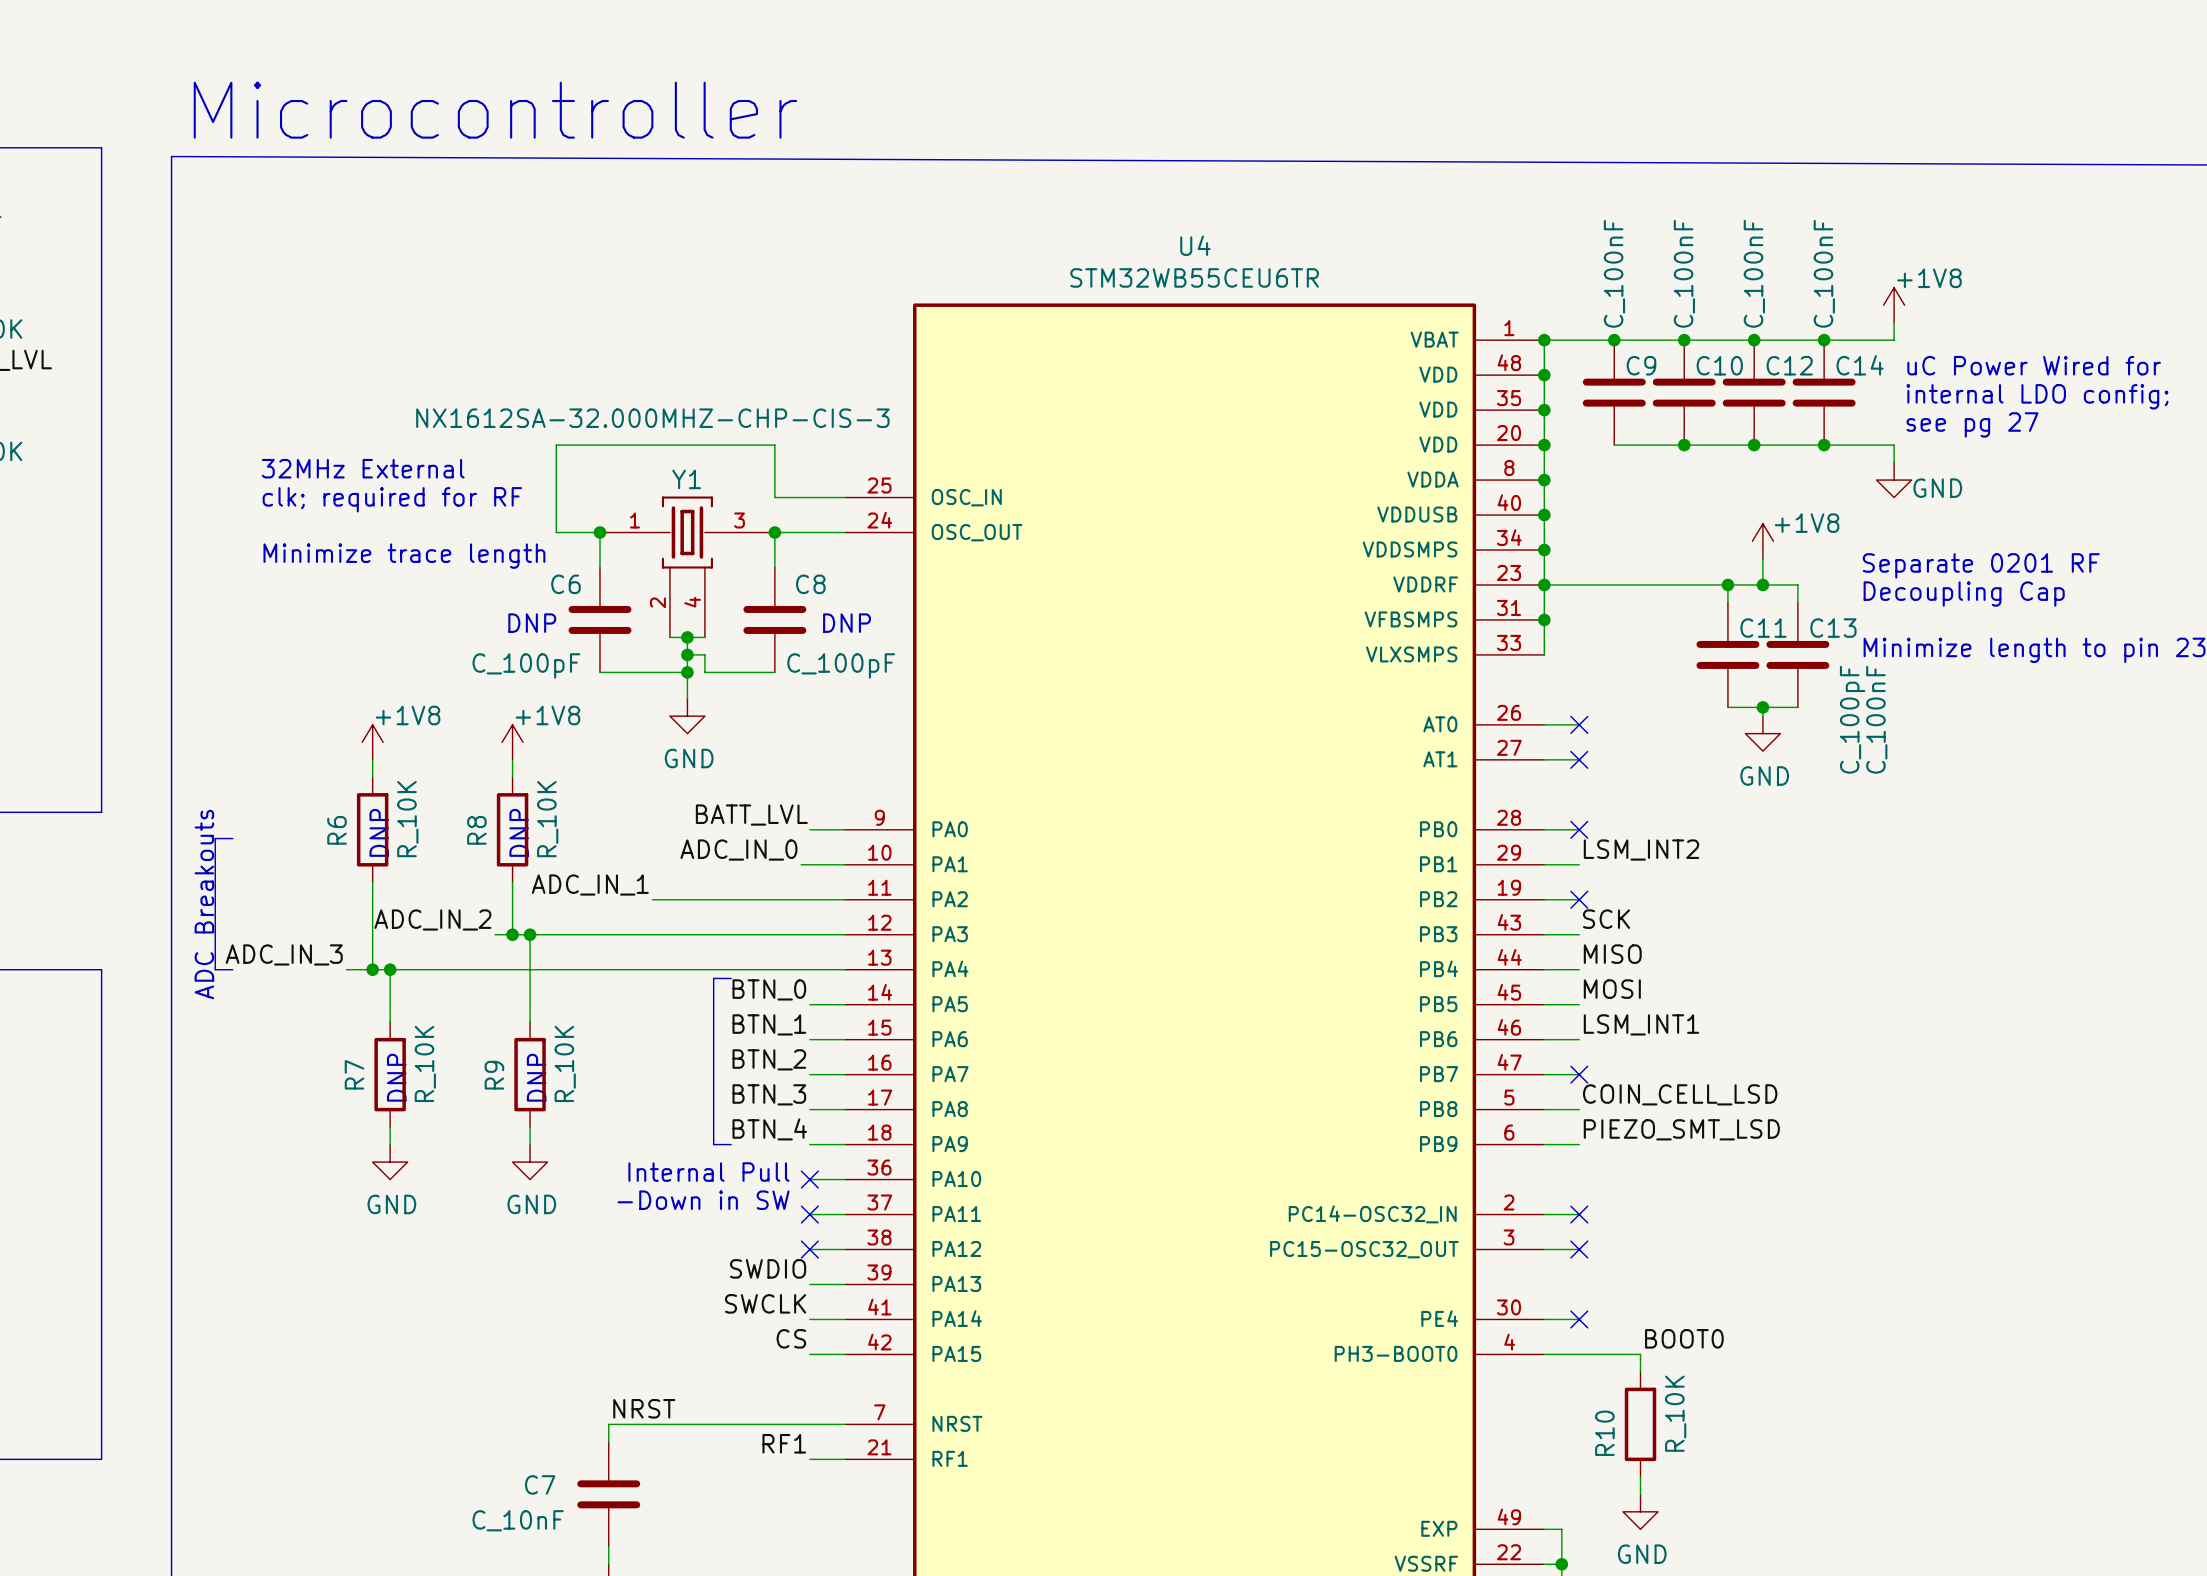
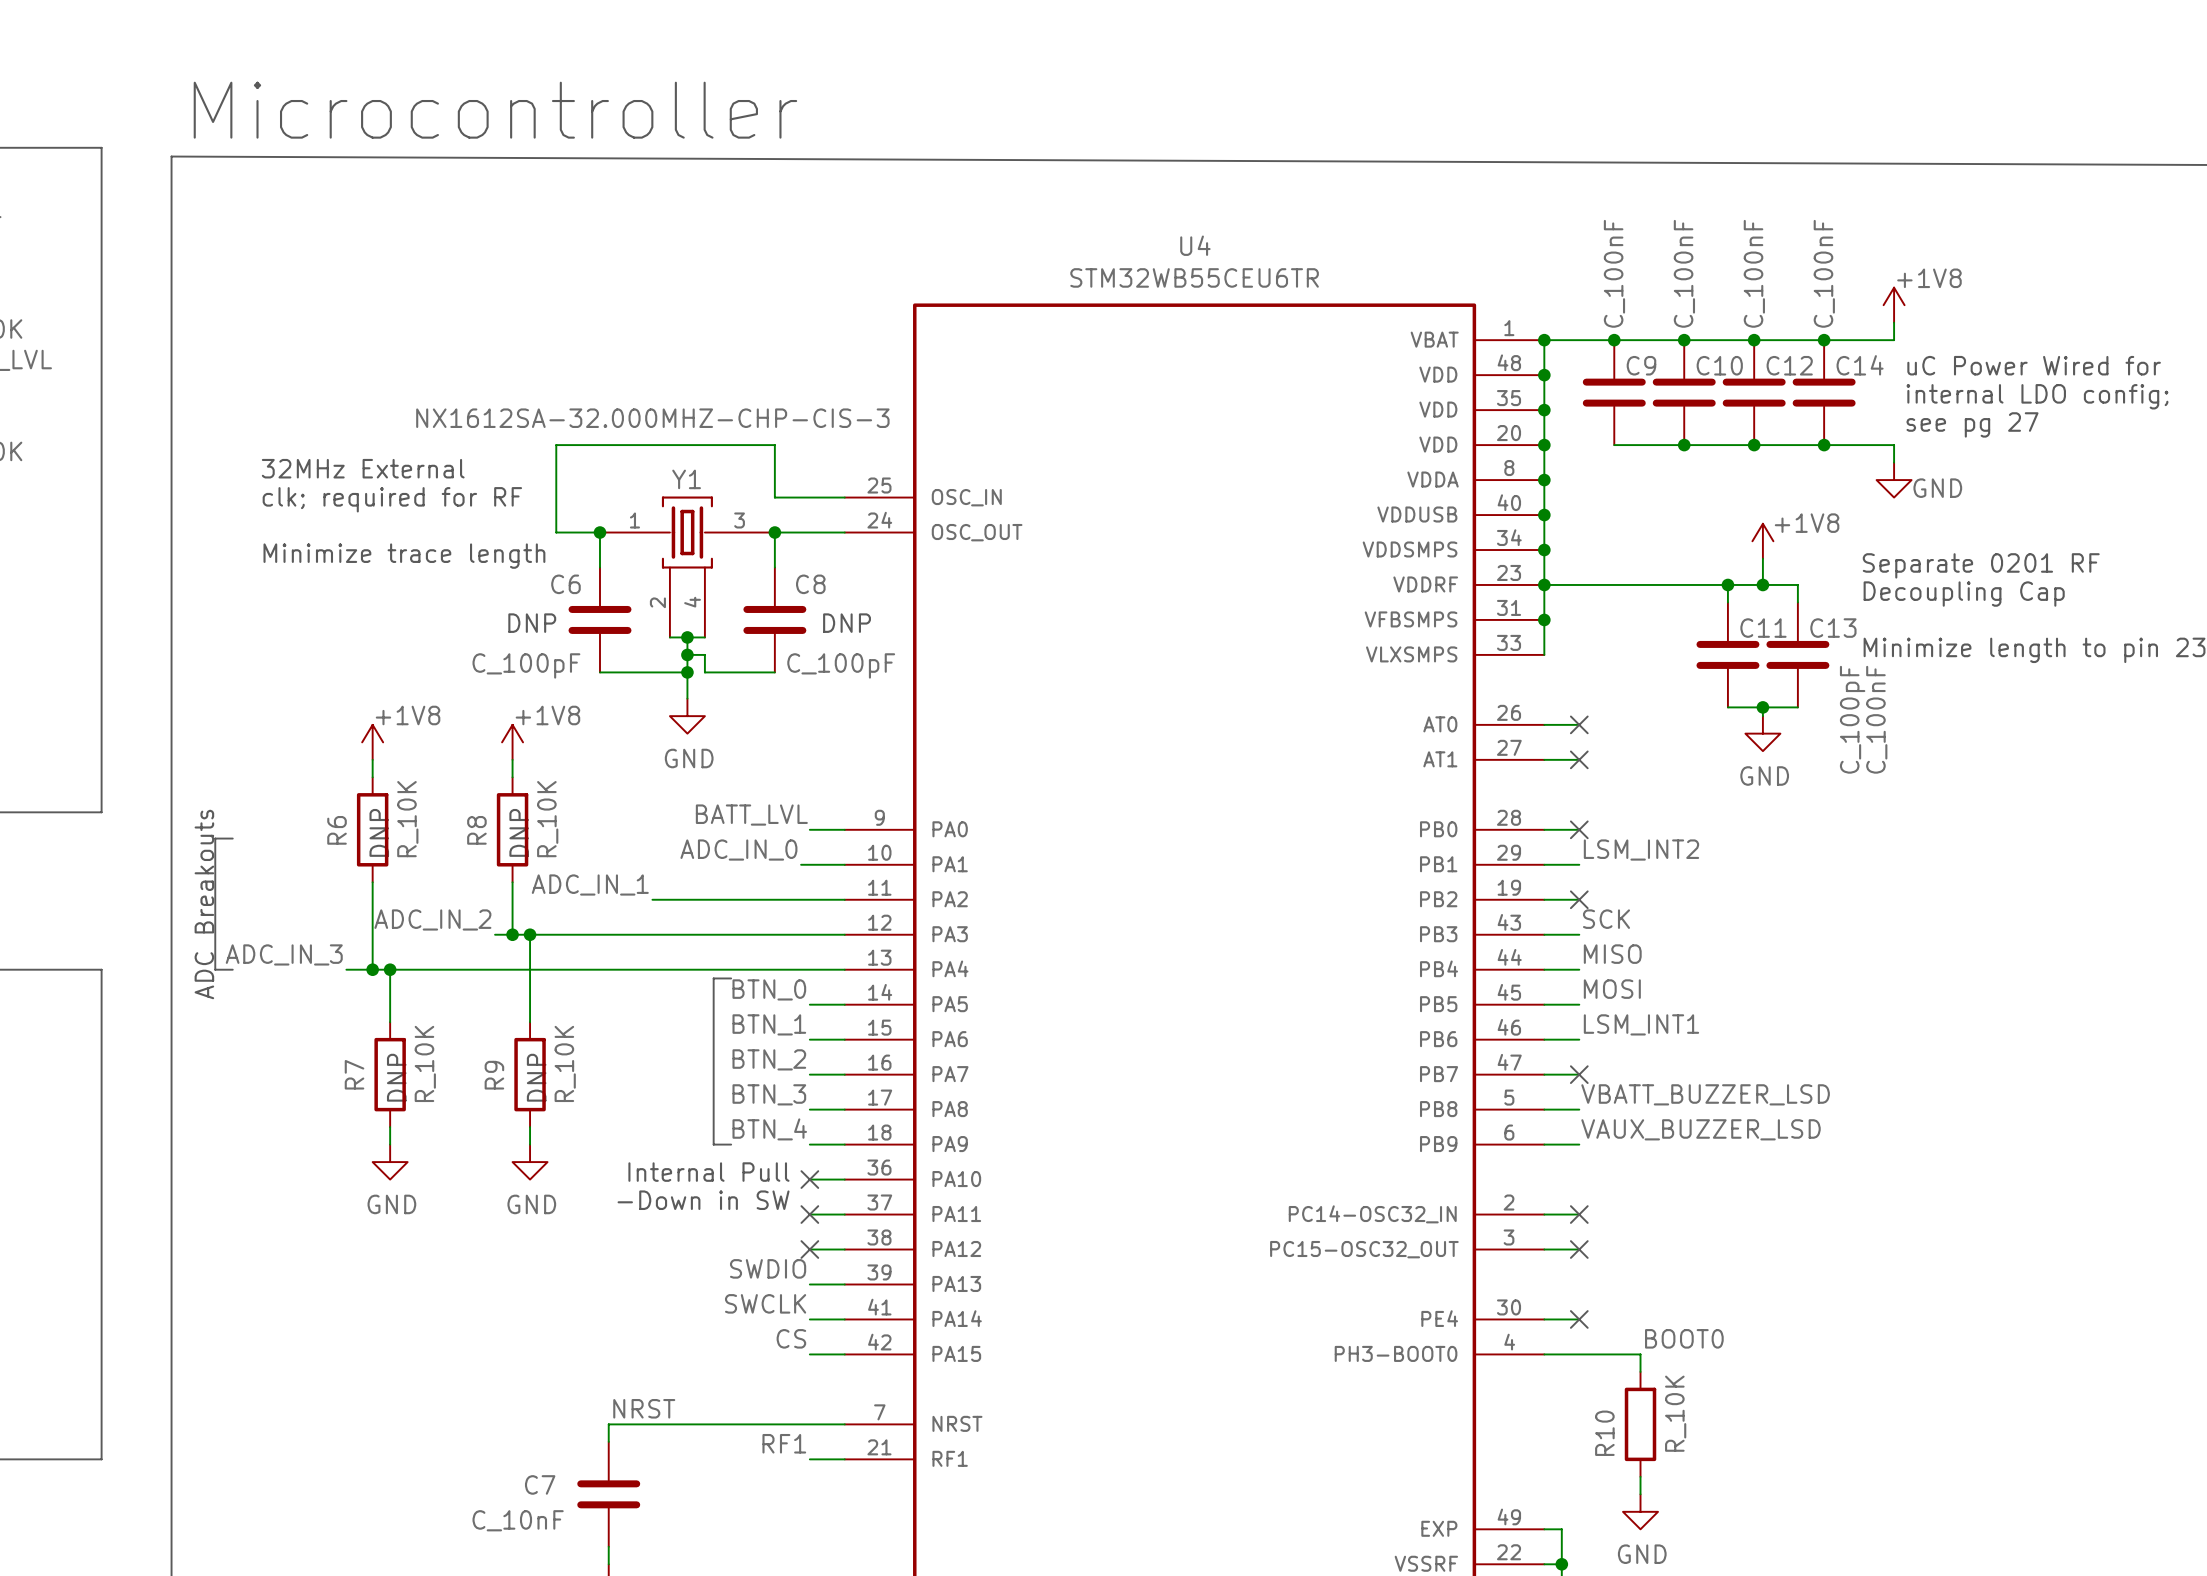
label: COIN_CELL_LSD (1680, 1094) -> VBATT_BUZZER_LSD (1705, 1094)
label: PIEZO_SMT_LSD (1681, 1129) -> VAUX_BUZZER_LSD (1701, 1129)

